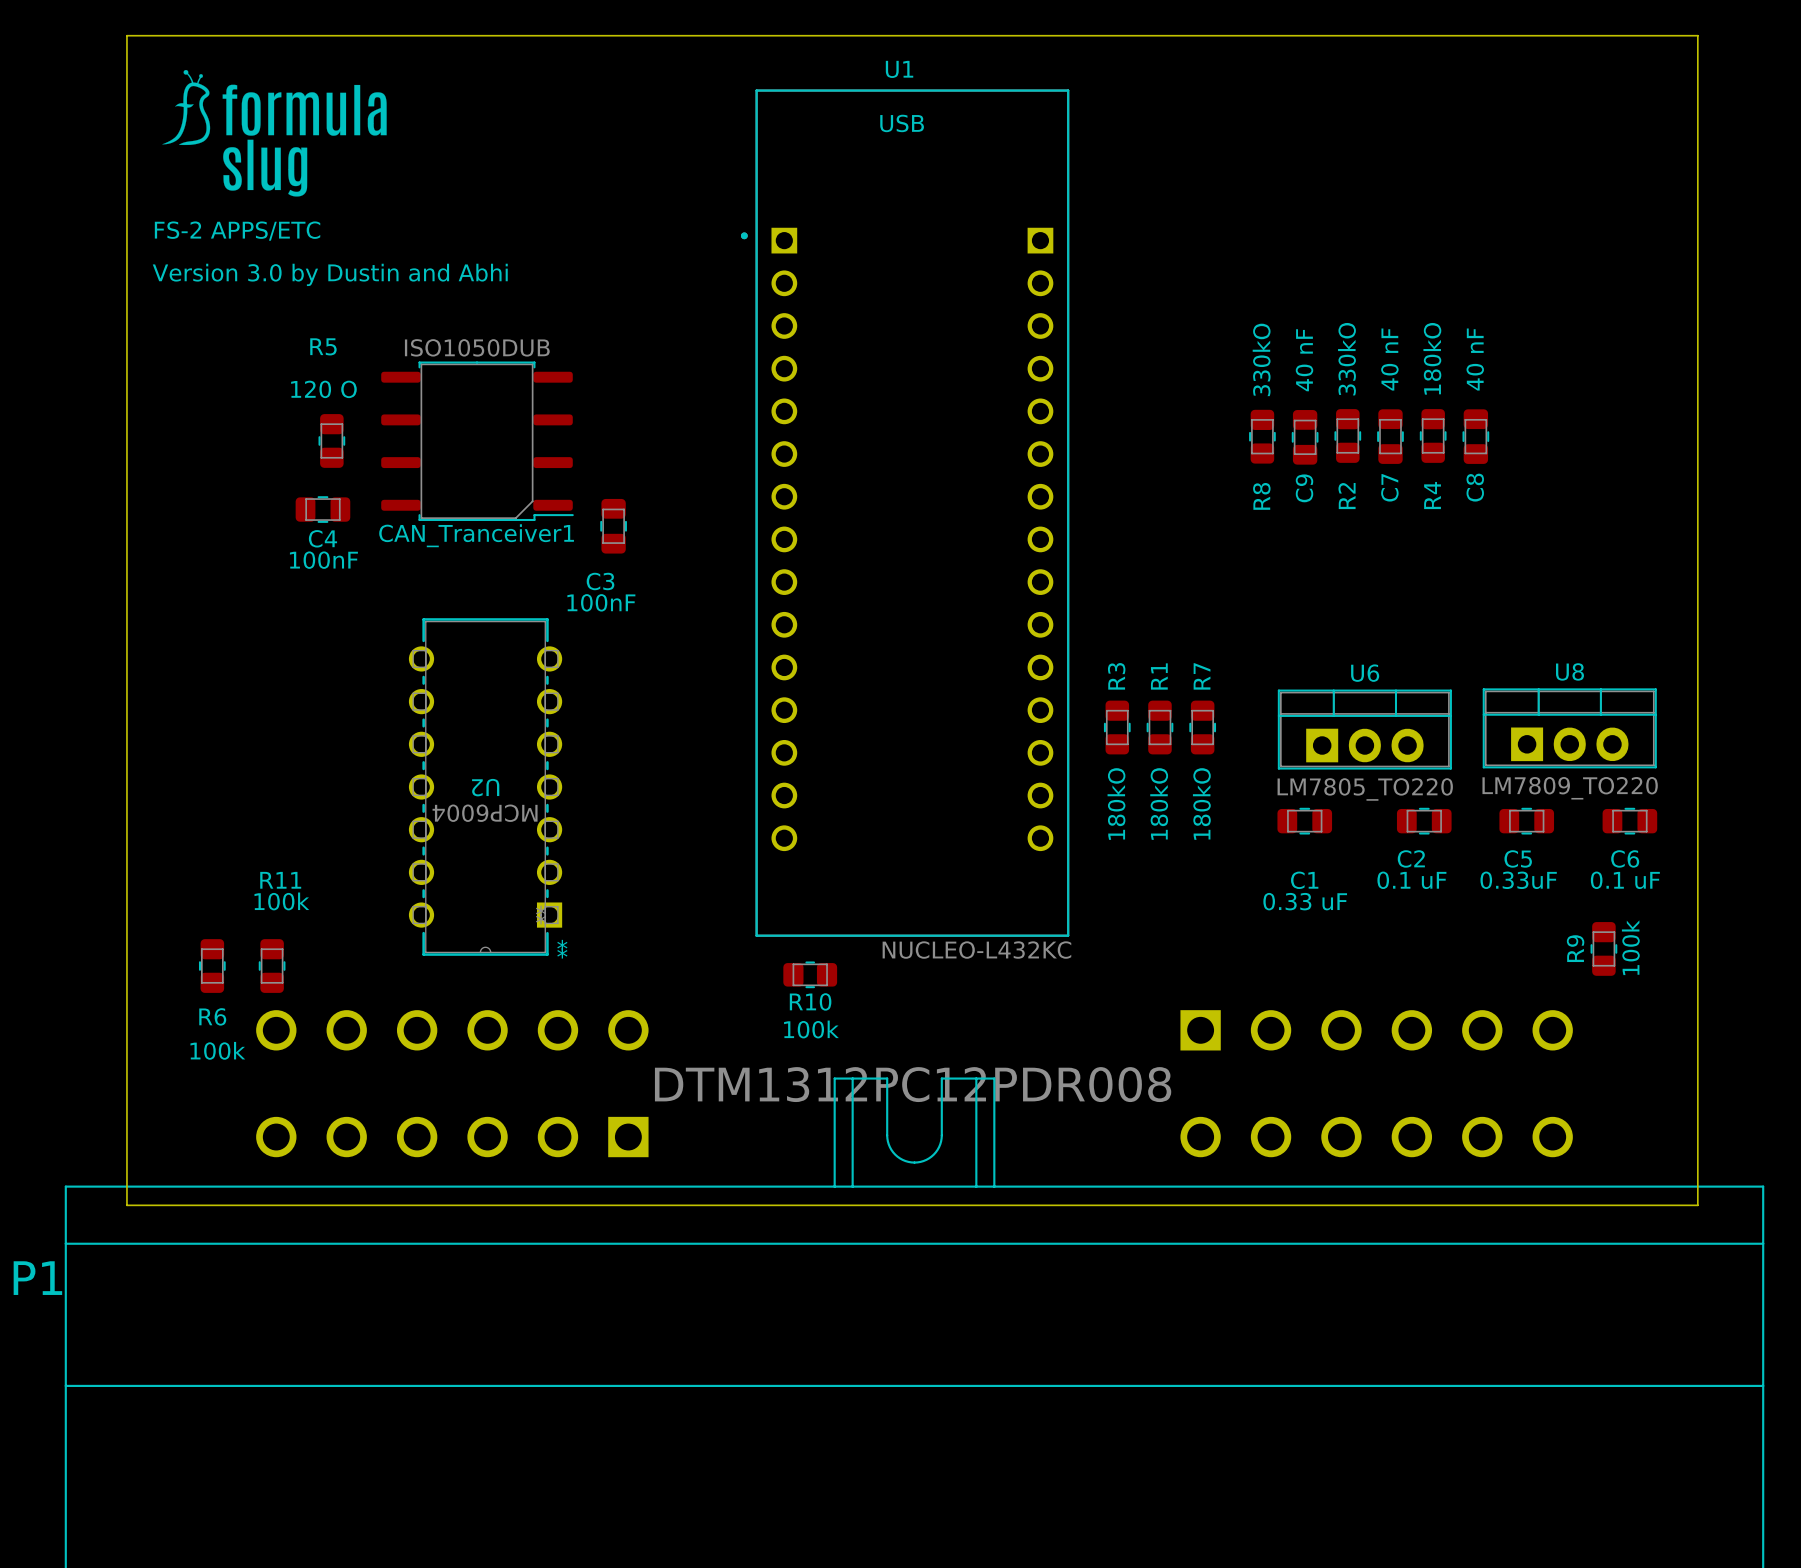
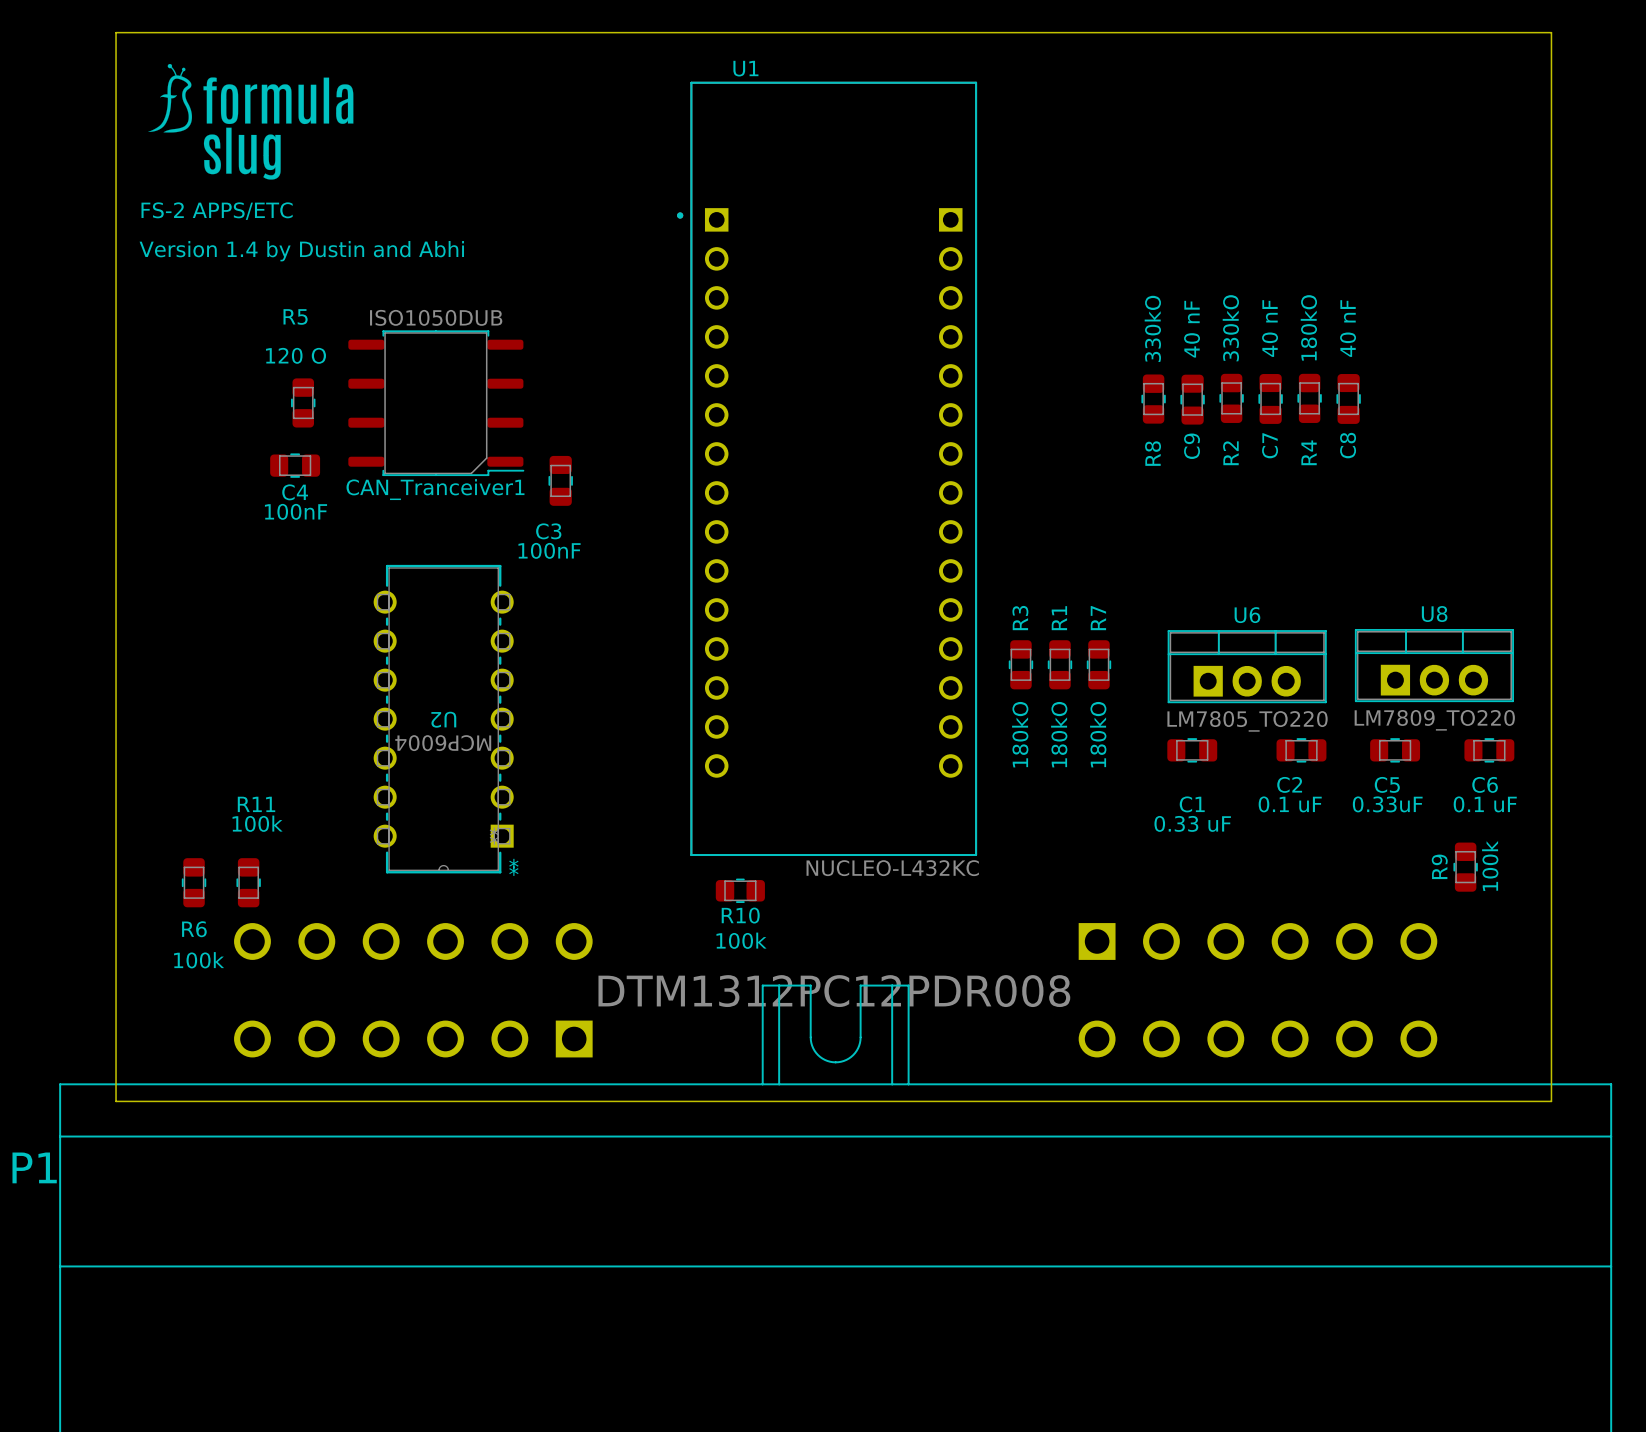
U1 name position: U1 (899, 69) -> U1 (745, 68)
text: USB (902, 123) -> none
text: Version 3.0 by Dustin and Abhi (330, 274) -> Version 1.4 by Dustin and Abhi (301, 251)

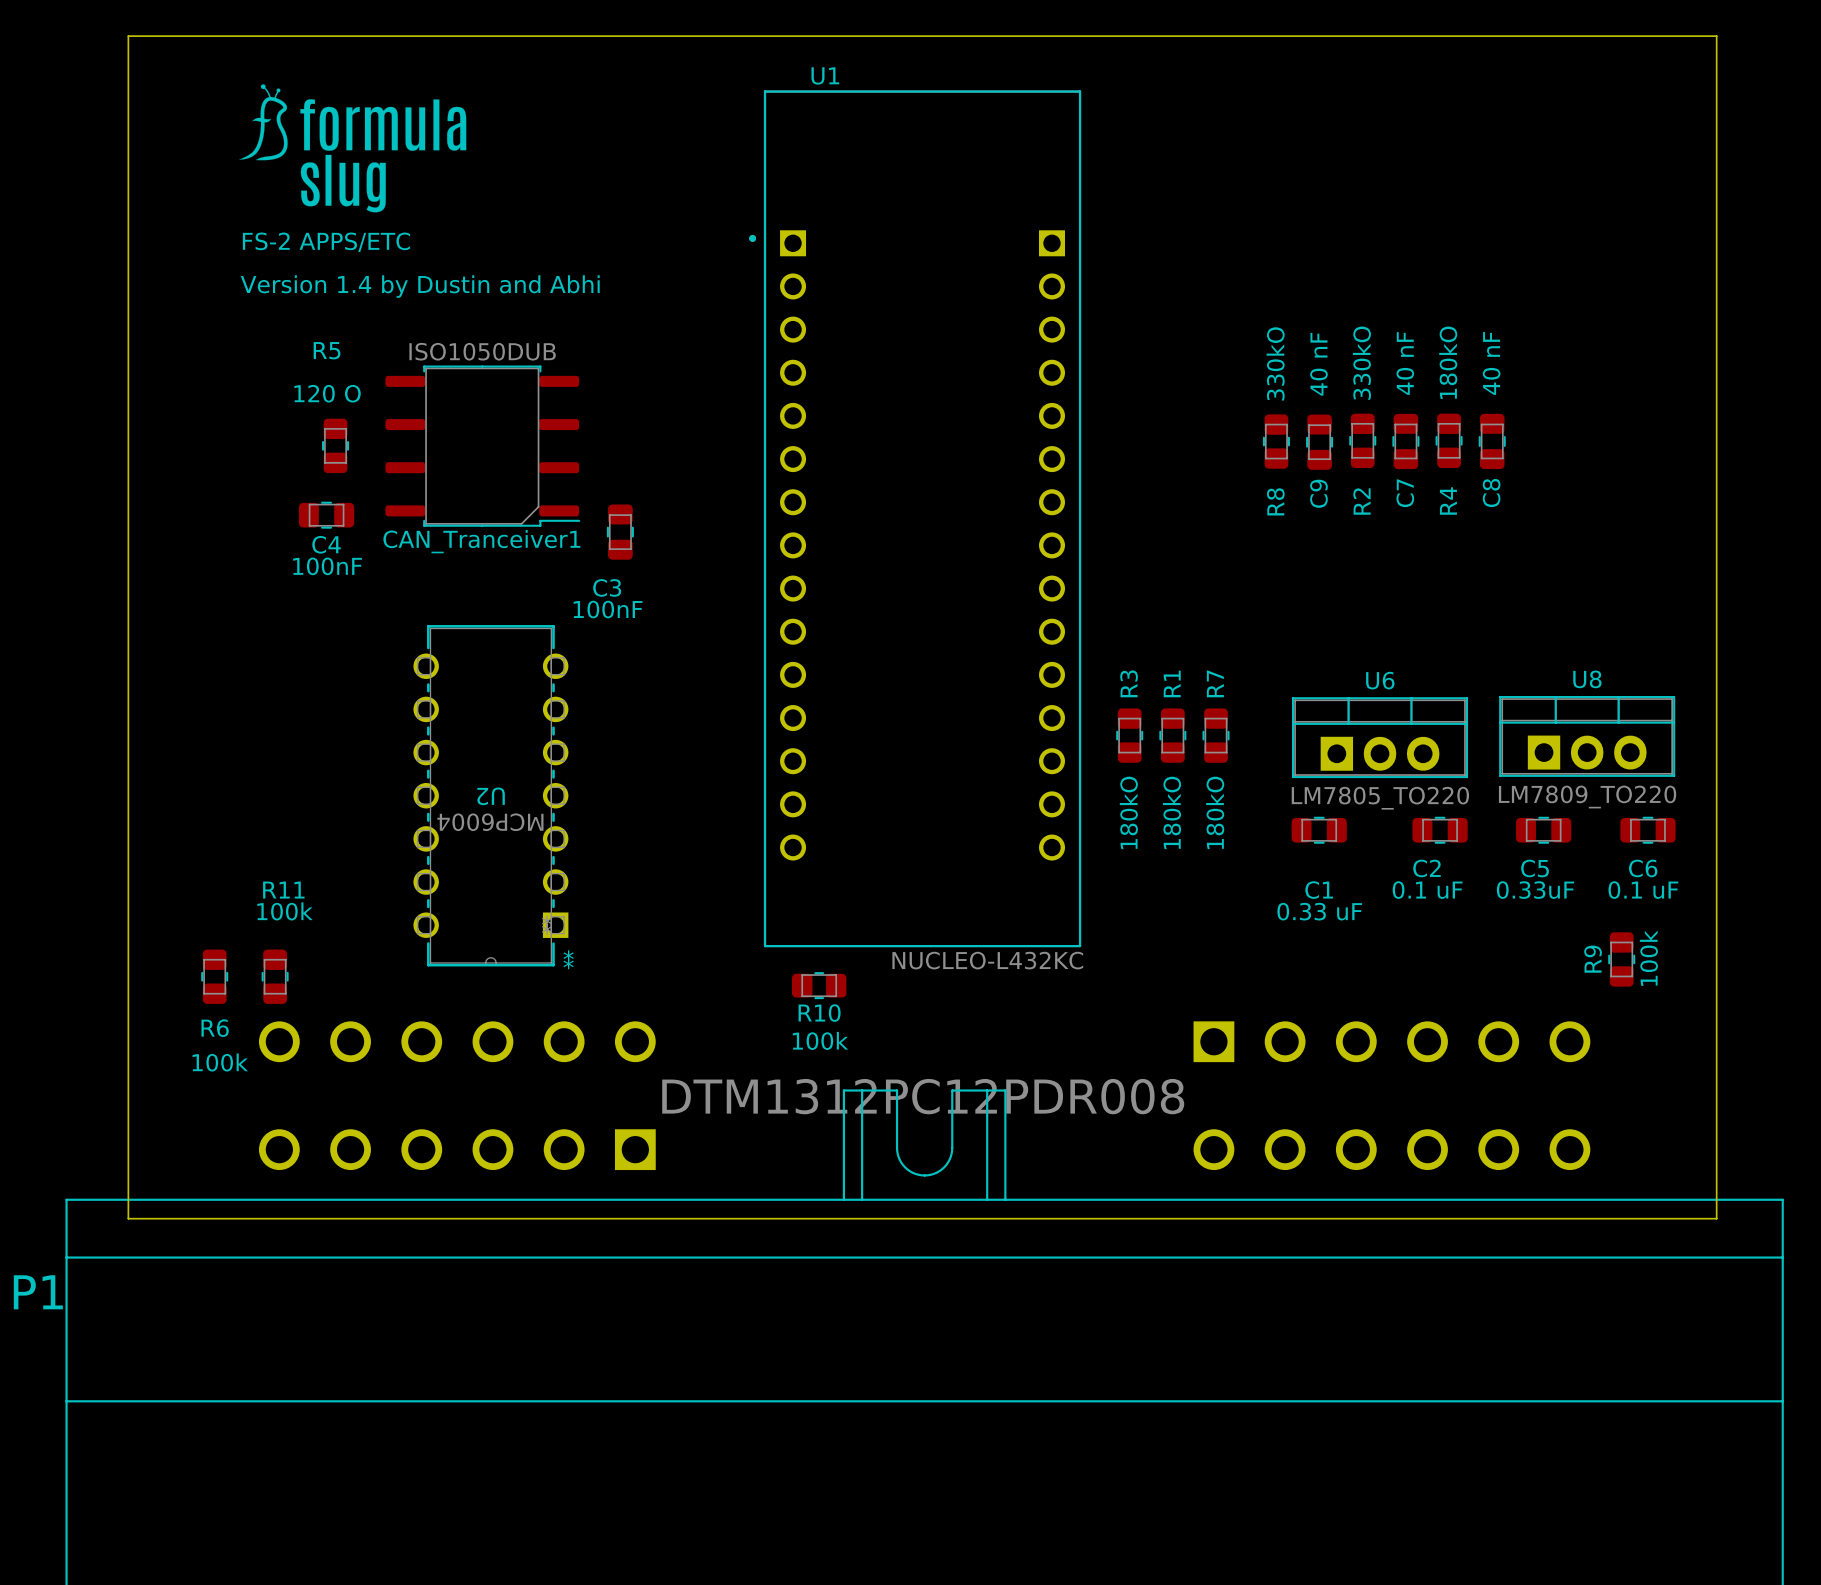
drawing position: (250, 121) -> (352, 148)
text position: FS-2 APPS/ETC (217, 211) -> FS-2 APPS/ETC (326, 242)
text position: Version 1.4 by Dustin and Abhi (301, 251) -> Version 1.4 by Dustin and Abhi (420, 286)

